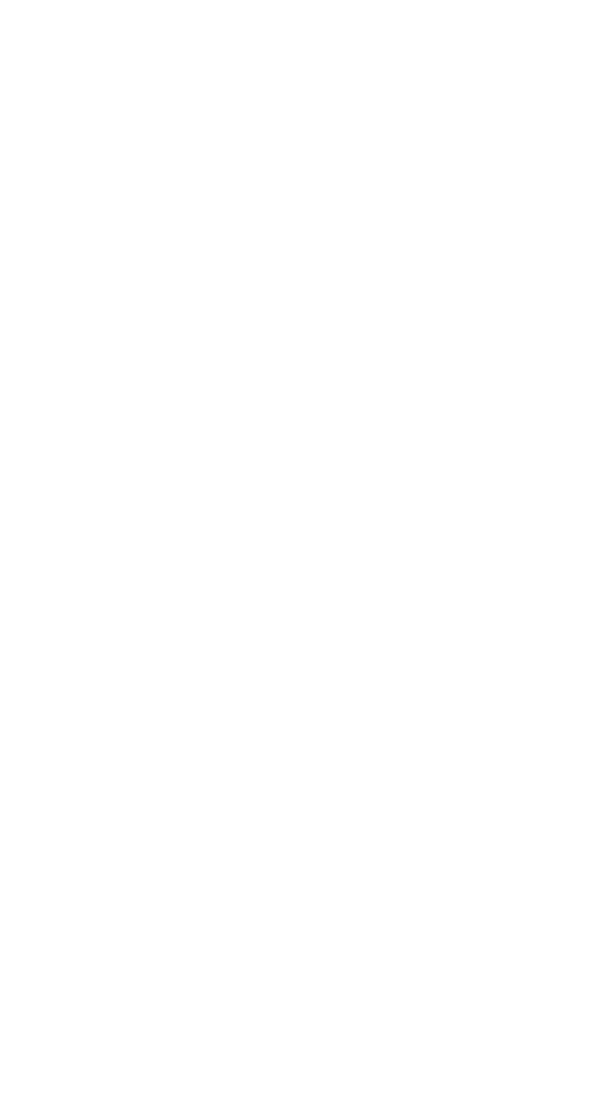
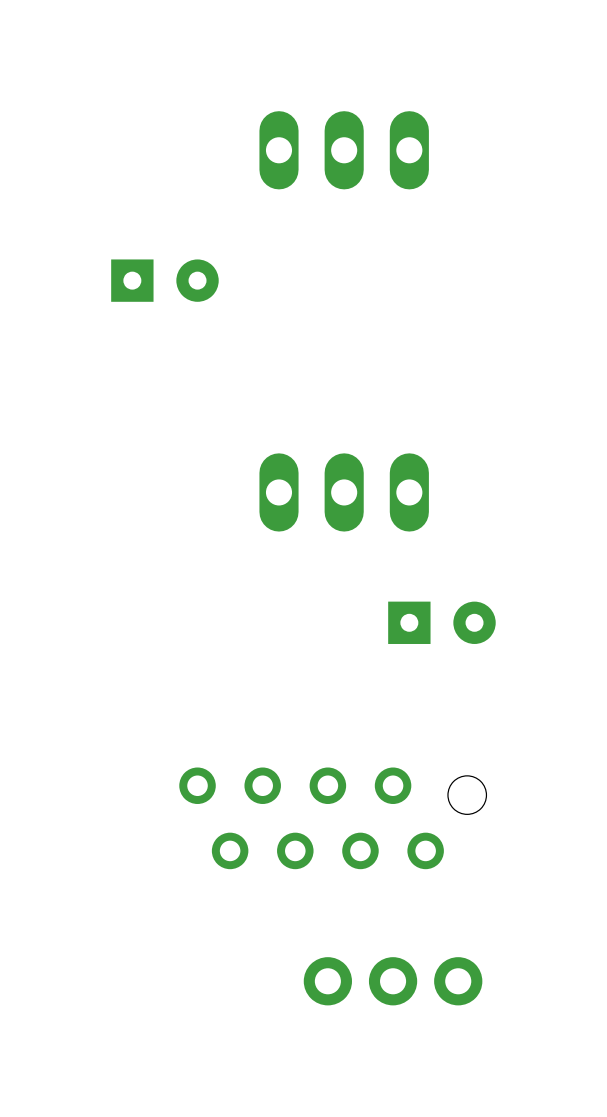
part: none -> (344, 150)
part: none -> (164, 280)
part: none -> (344, 492)
part: none -> (441, 622)
part: none -> (332, 818)
part: none -> (393, 981)

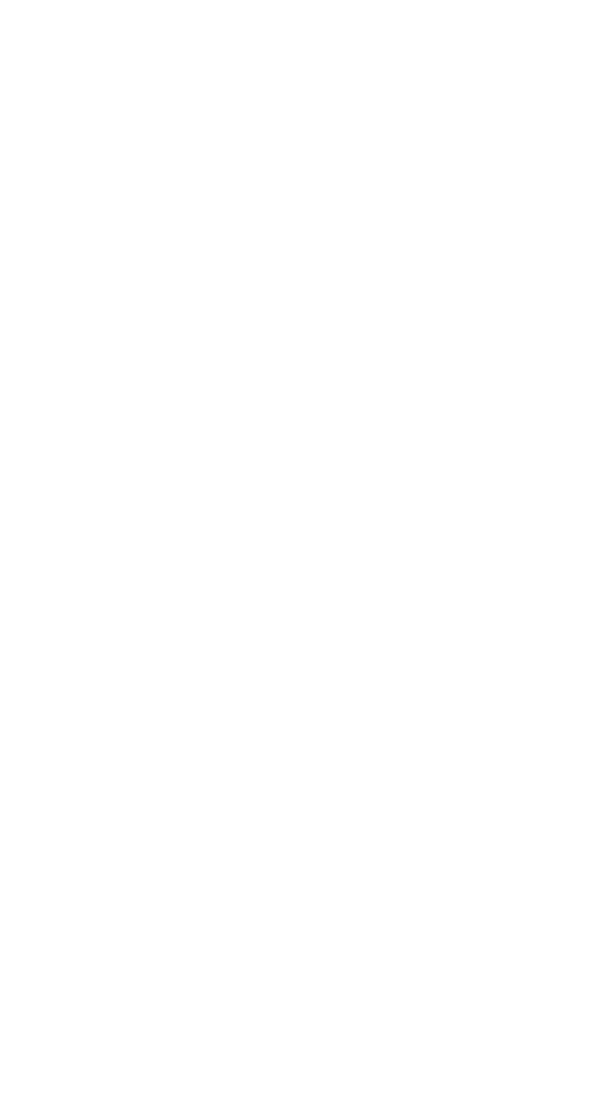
part: (344, 150) -> none
part: (164, 280) -> none
part: (344, 492) -> none
part: (441, 622) -> none
part: (332, 818) -> none
part: (393, 981) -> none

